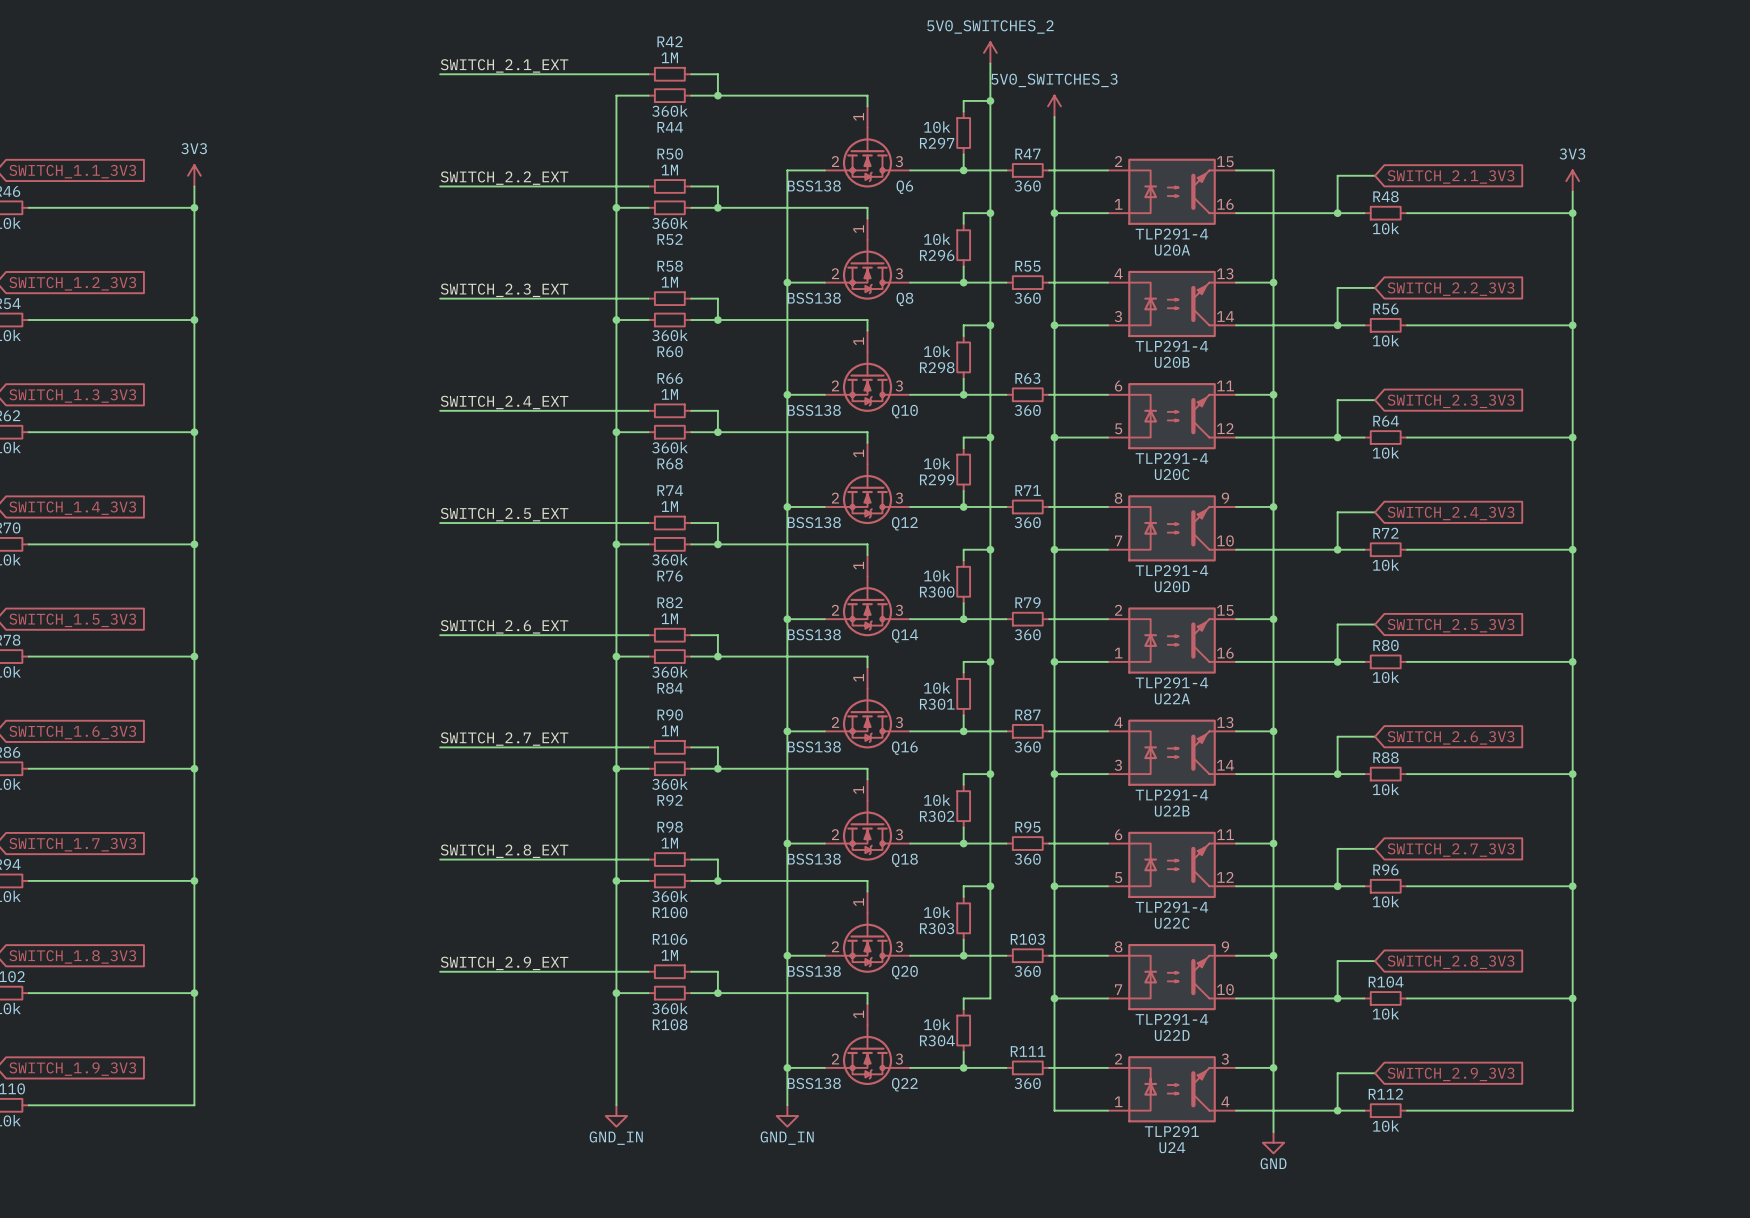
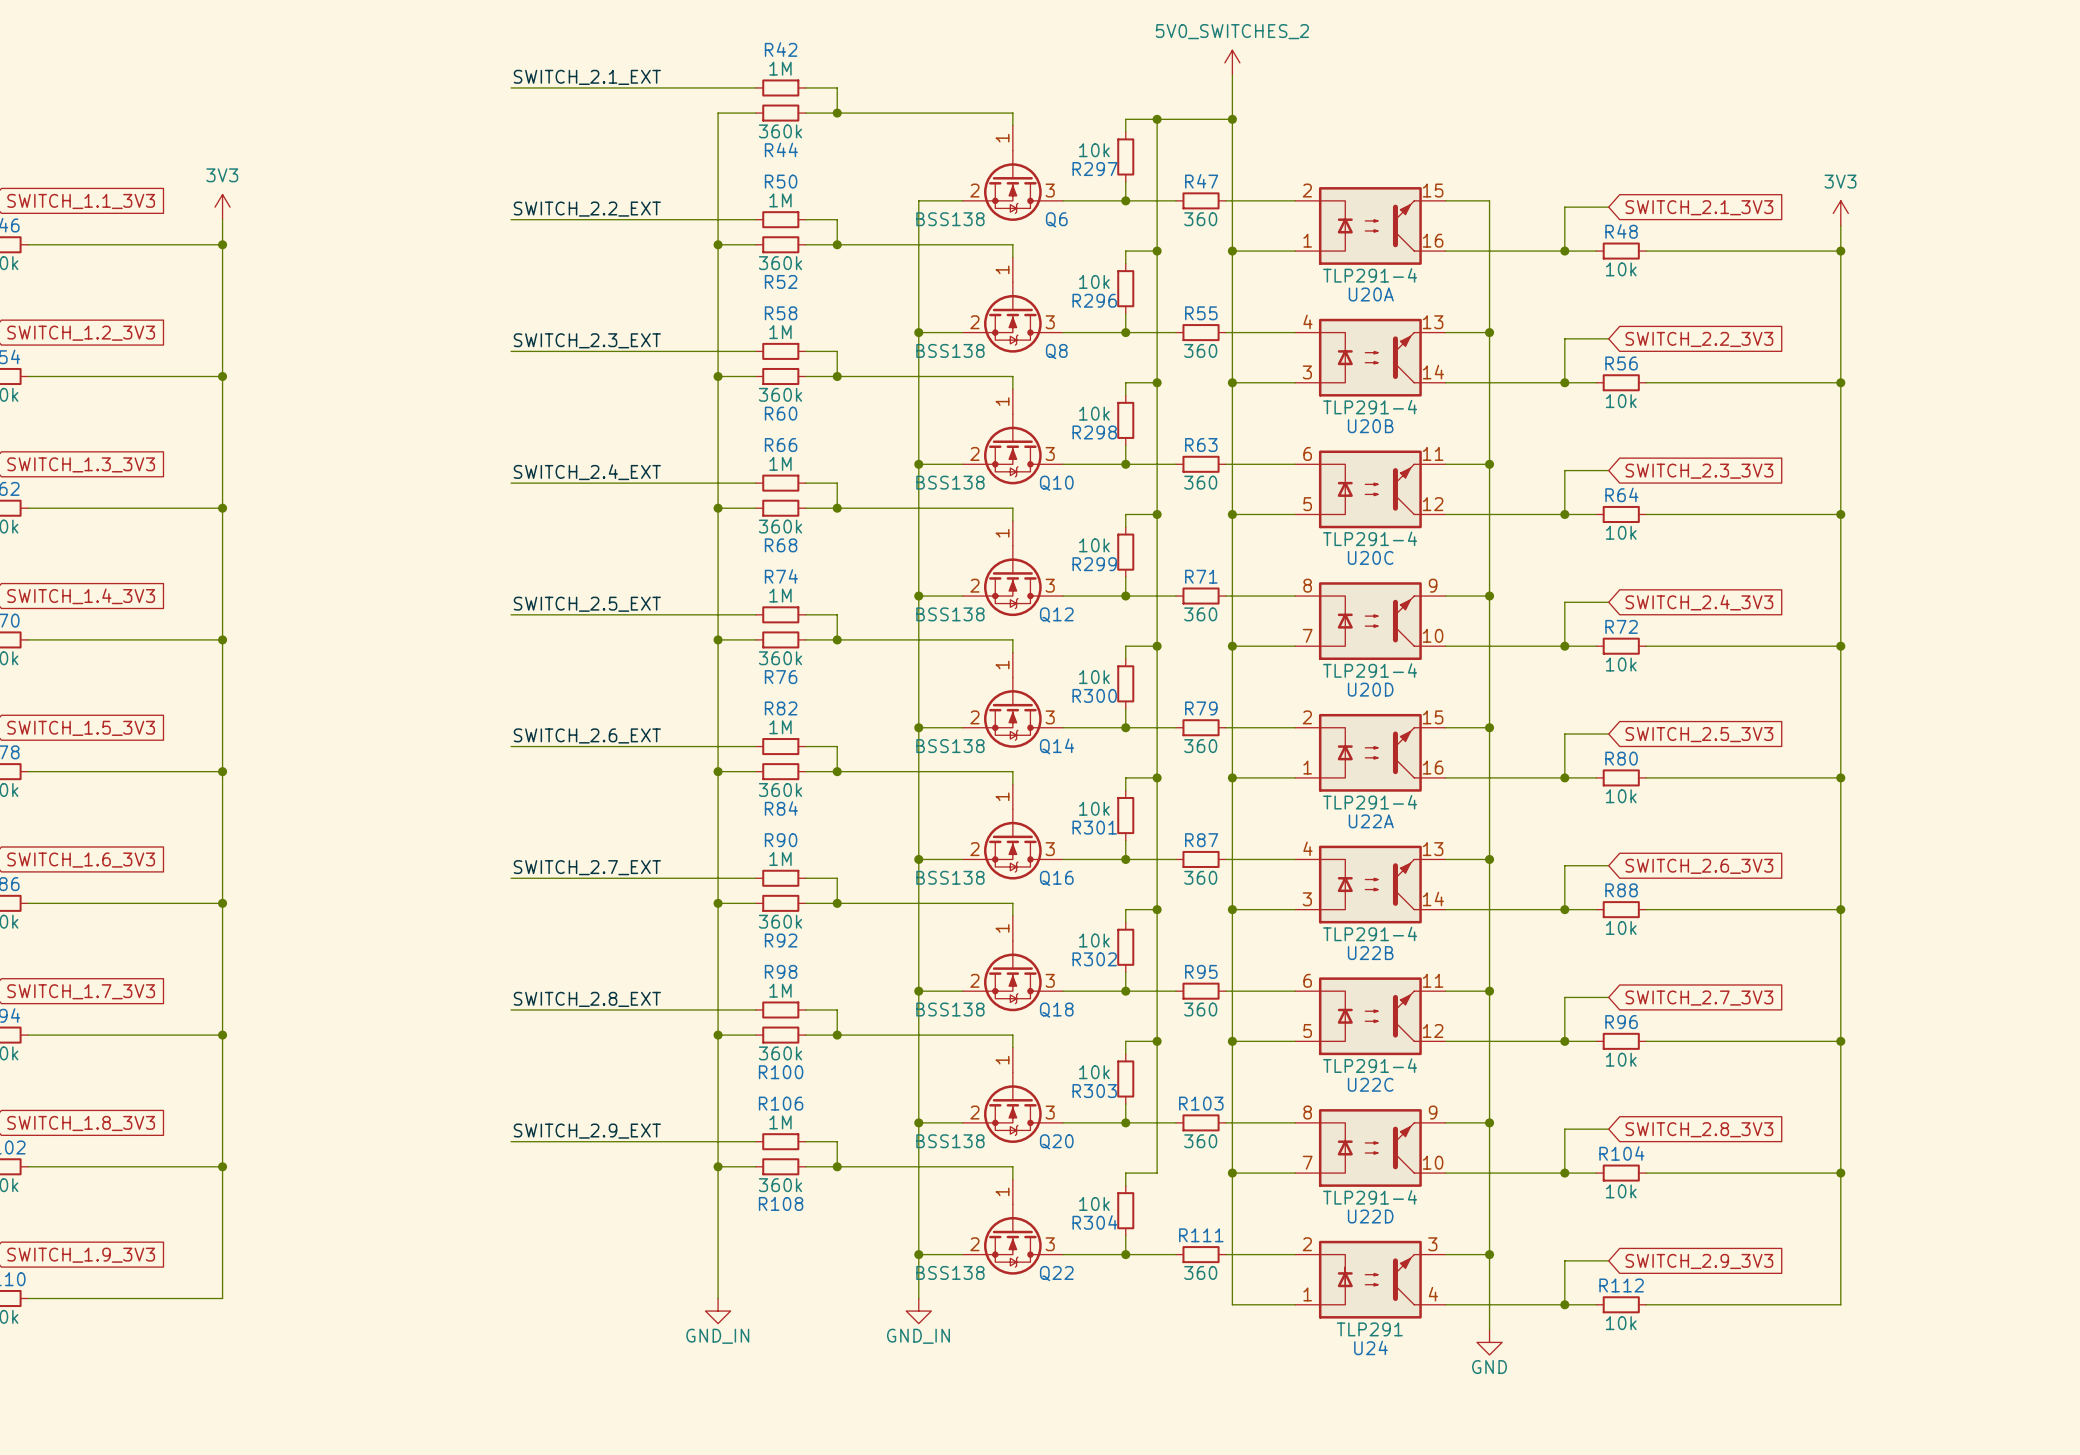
power symbol position: 5V0_SWITCHES_2 (990, 52) -> 5V0_SWITCHES_2 (1232, 62)
wire: (990, 63) (990, 100) -> (1232, 119) (1157, 119)
wire: none -> (1232, 75) (1232, 138)
junction: none -> (1232, 119)
power symbol: 5V0_SWITCHES_3 (1054, 106) -> none

